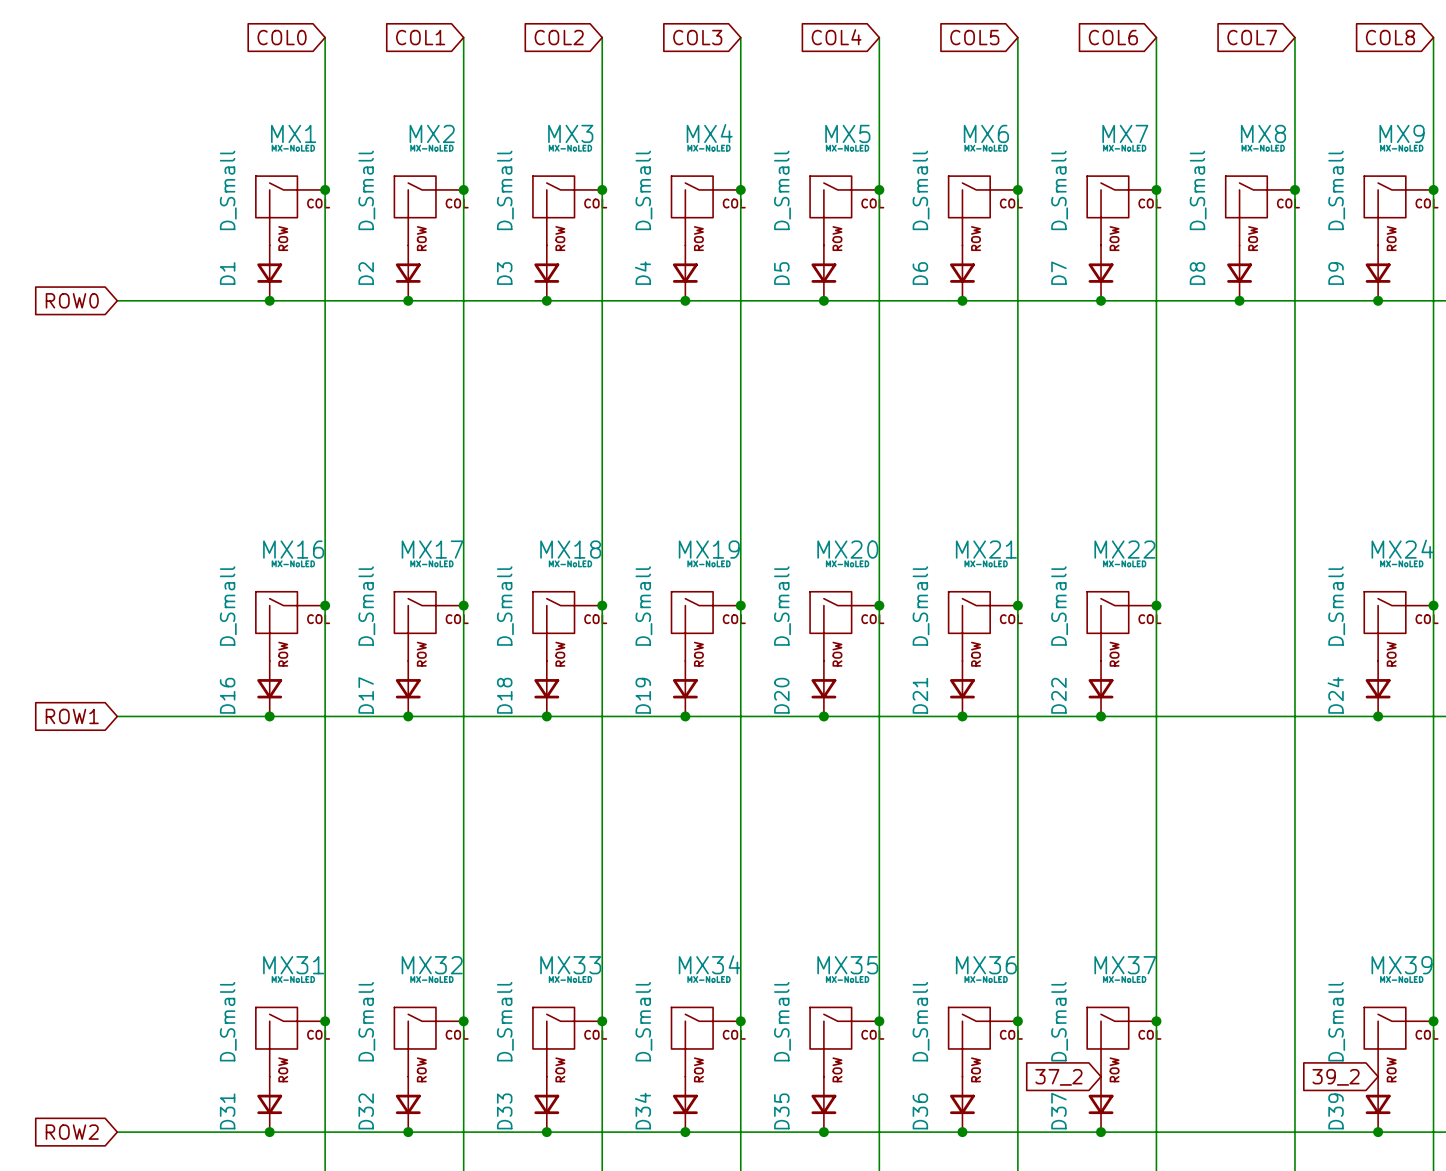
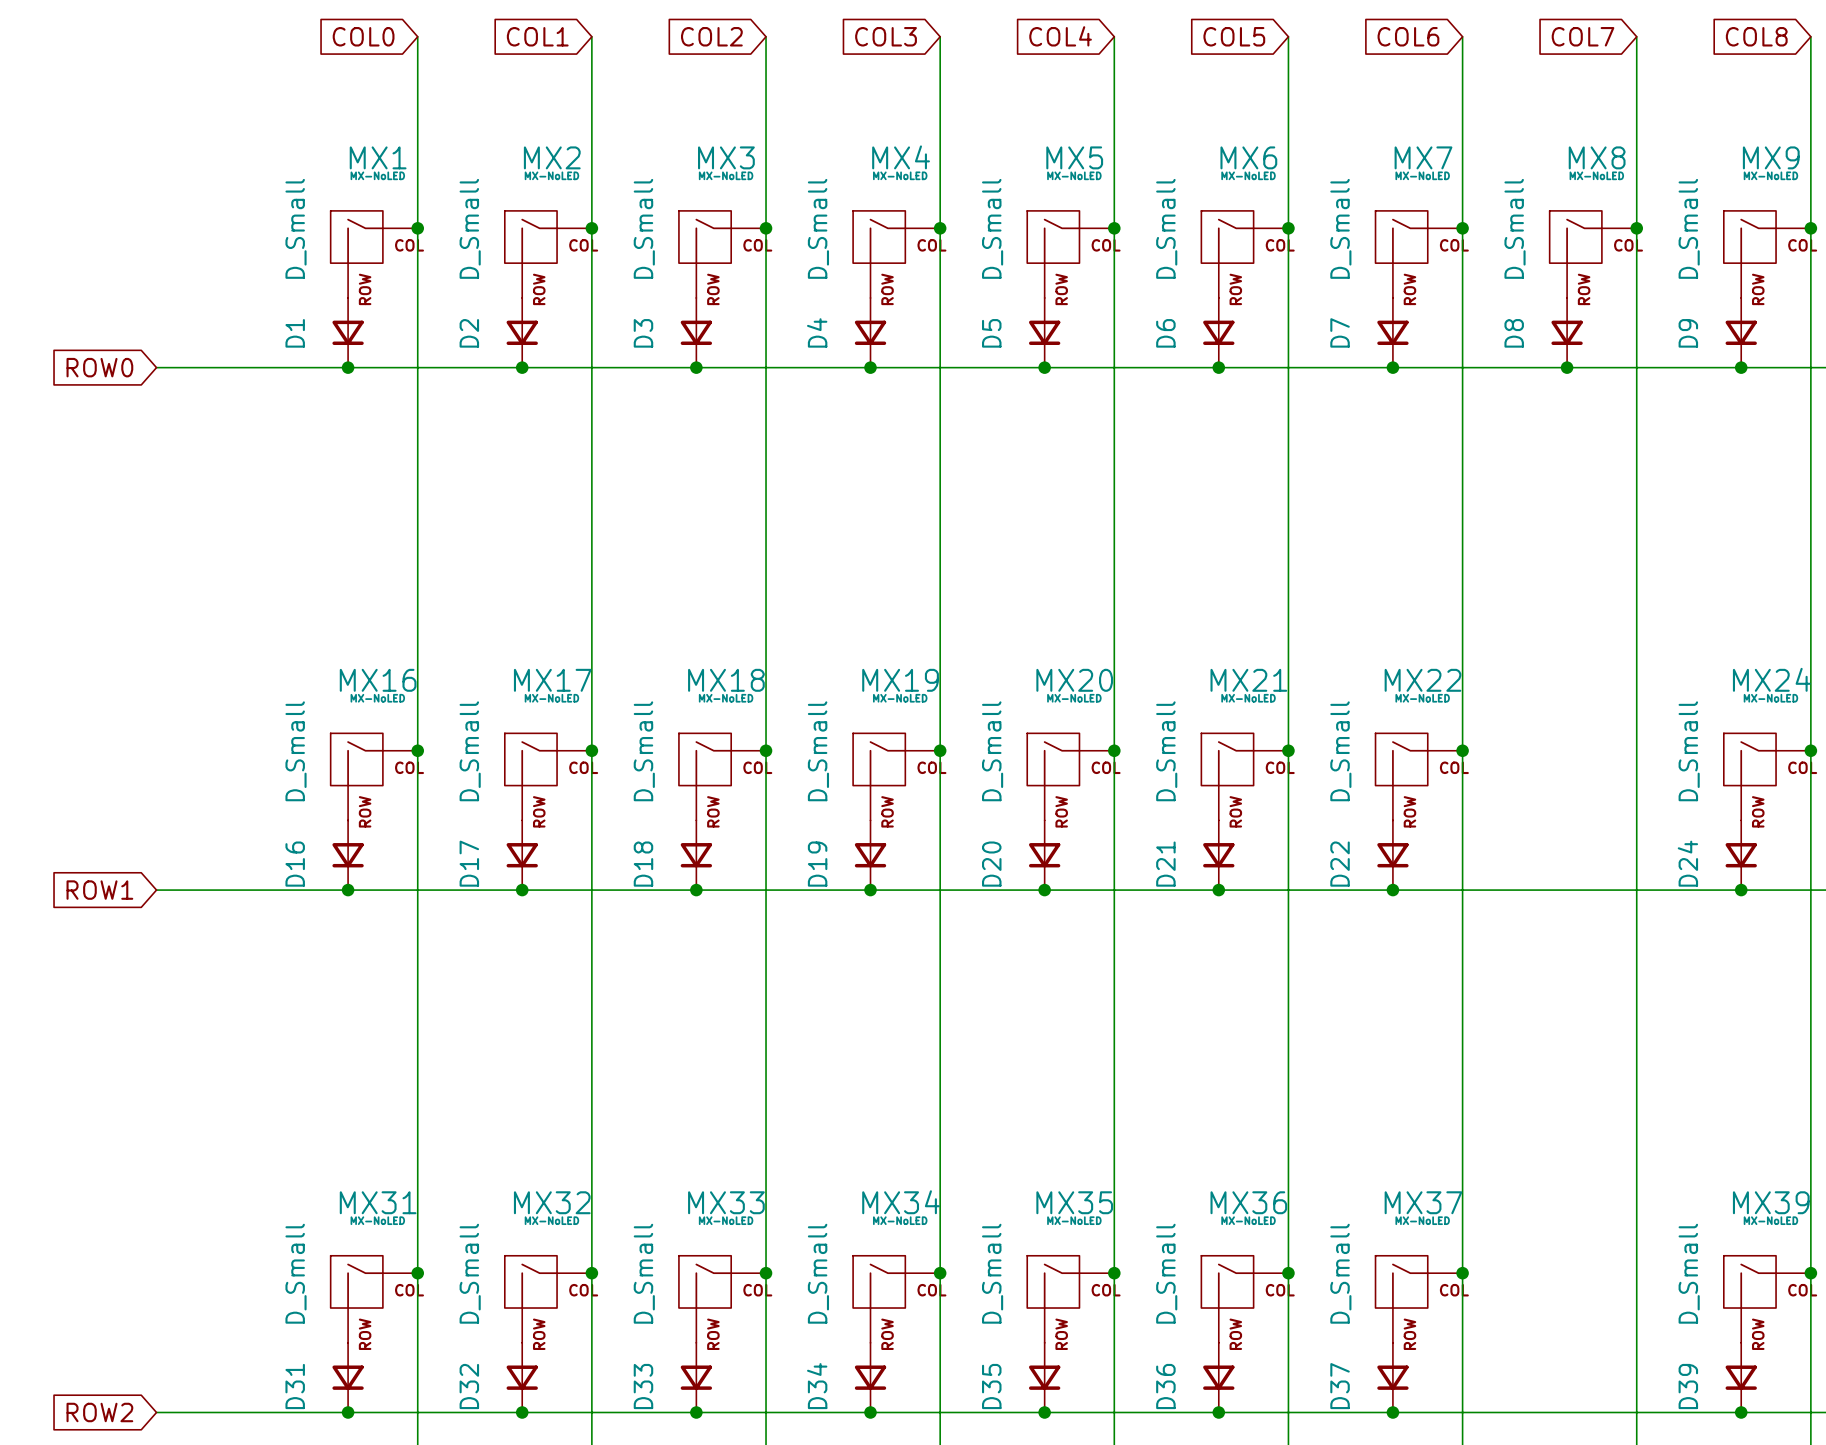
global label: 37_2 (1058, 1077) -> none
global label: 39_2 (1336, 1077) -> none

